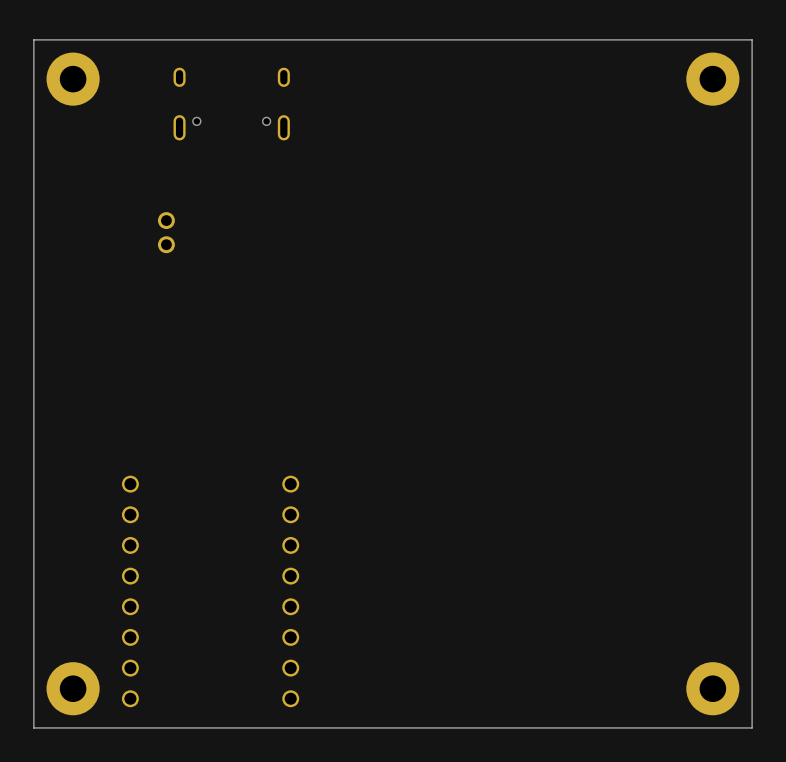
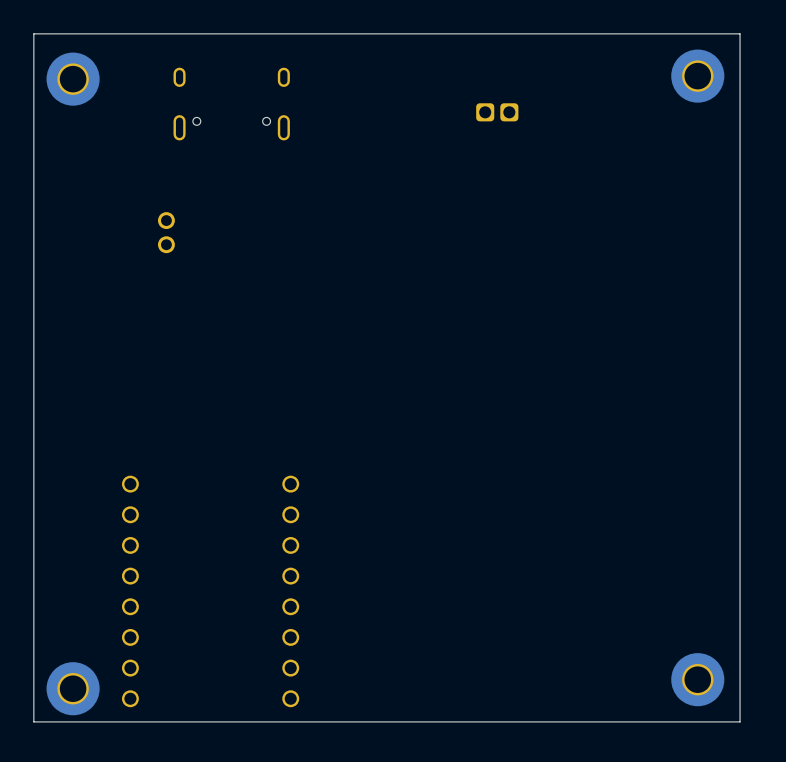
board edge: (33, 39) (752, 39) (752, 727) (33, 727) (33, 721) -> (33, 39) (33, 33) (740, 33) (740, 721) (33, 721)
part position: (712, 79) -> (697, 76)
part: none -> (497, 112)
part position: (712, 688) -> (697, 679)

